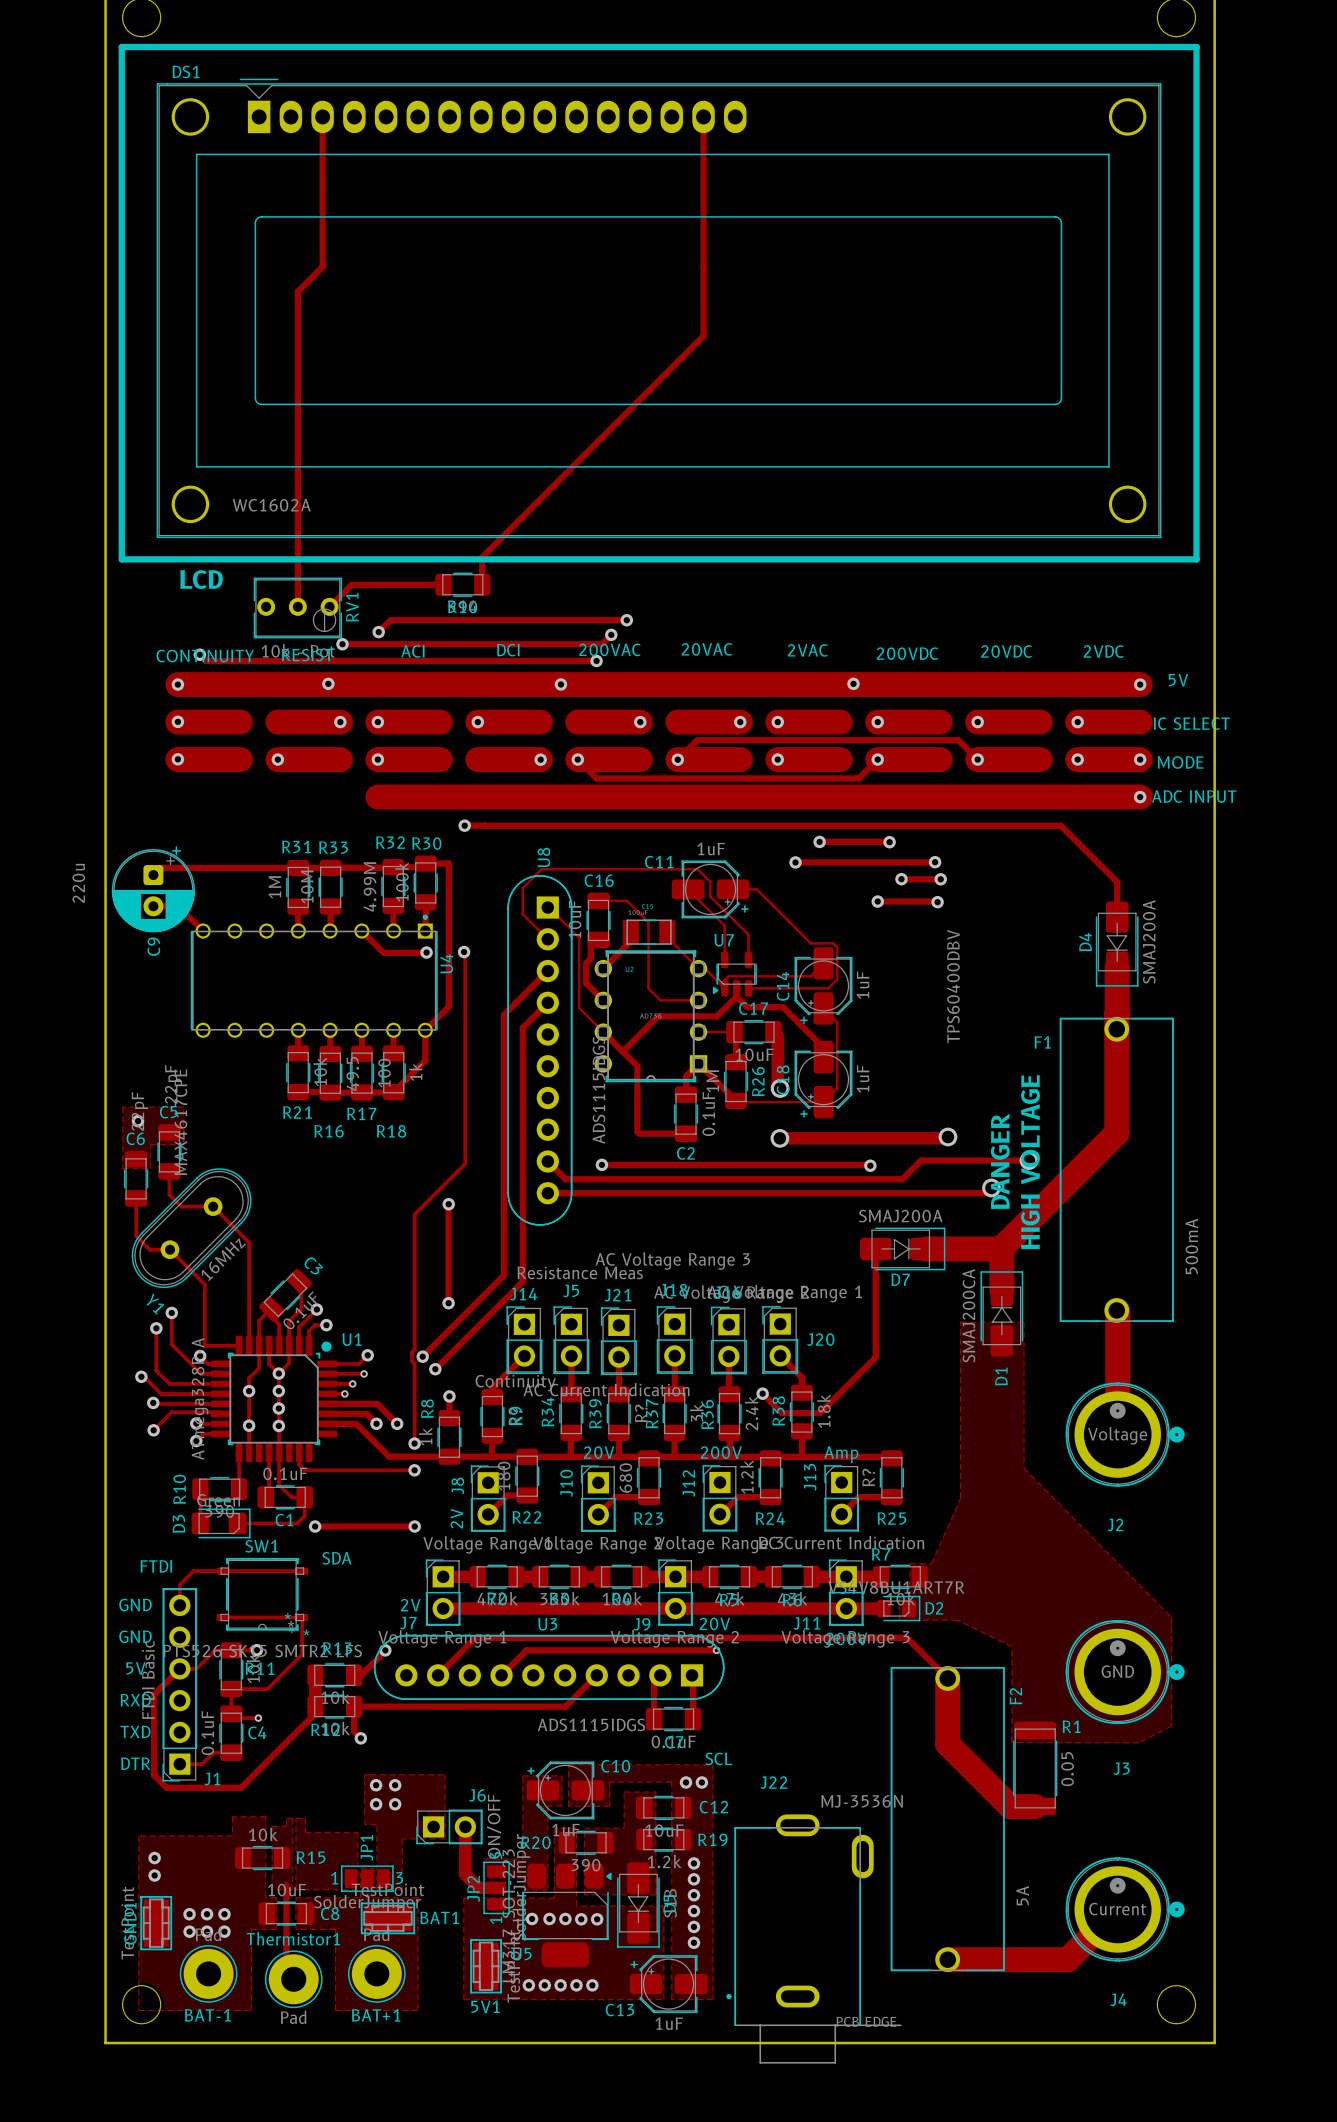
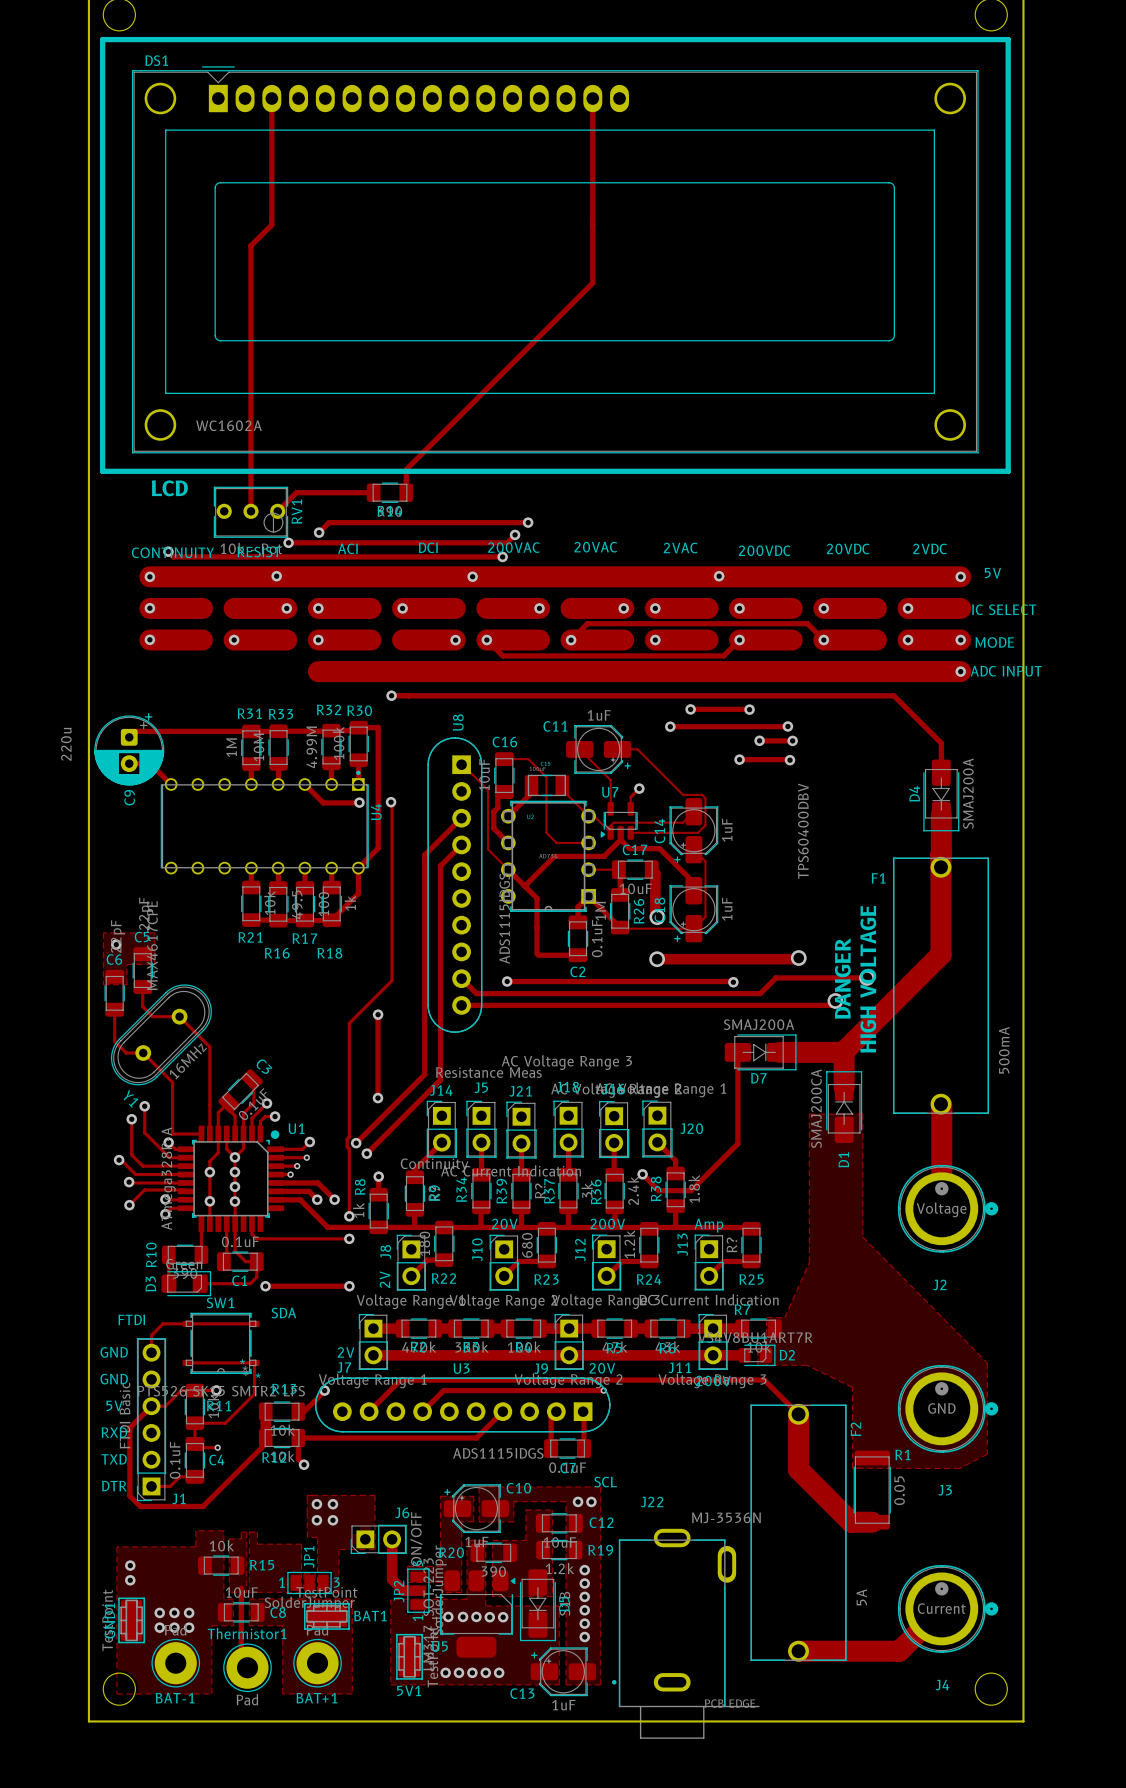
via: none -> (639, 788)
track: (547, 939) (522, 914) (522, 888) (541, 869) (697, 869) (710, 881) (710, 896) (748, 934) (748, 946) -> (639, 788) (630, 797)

